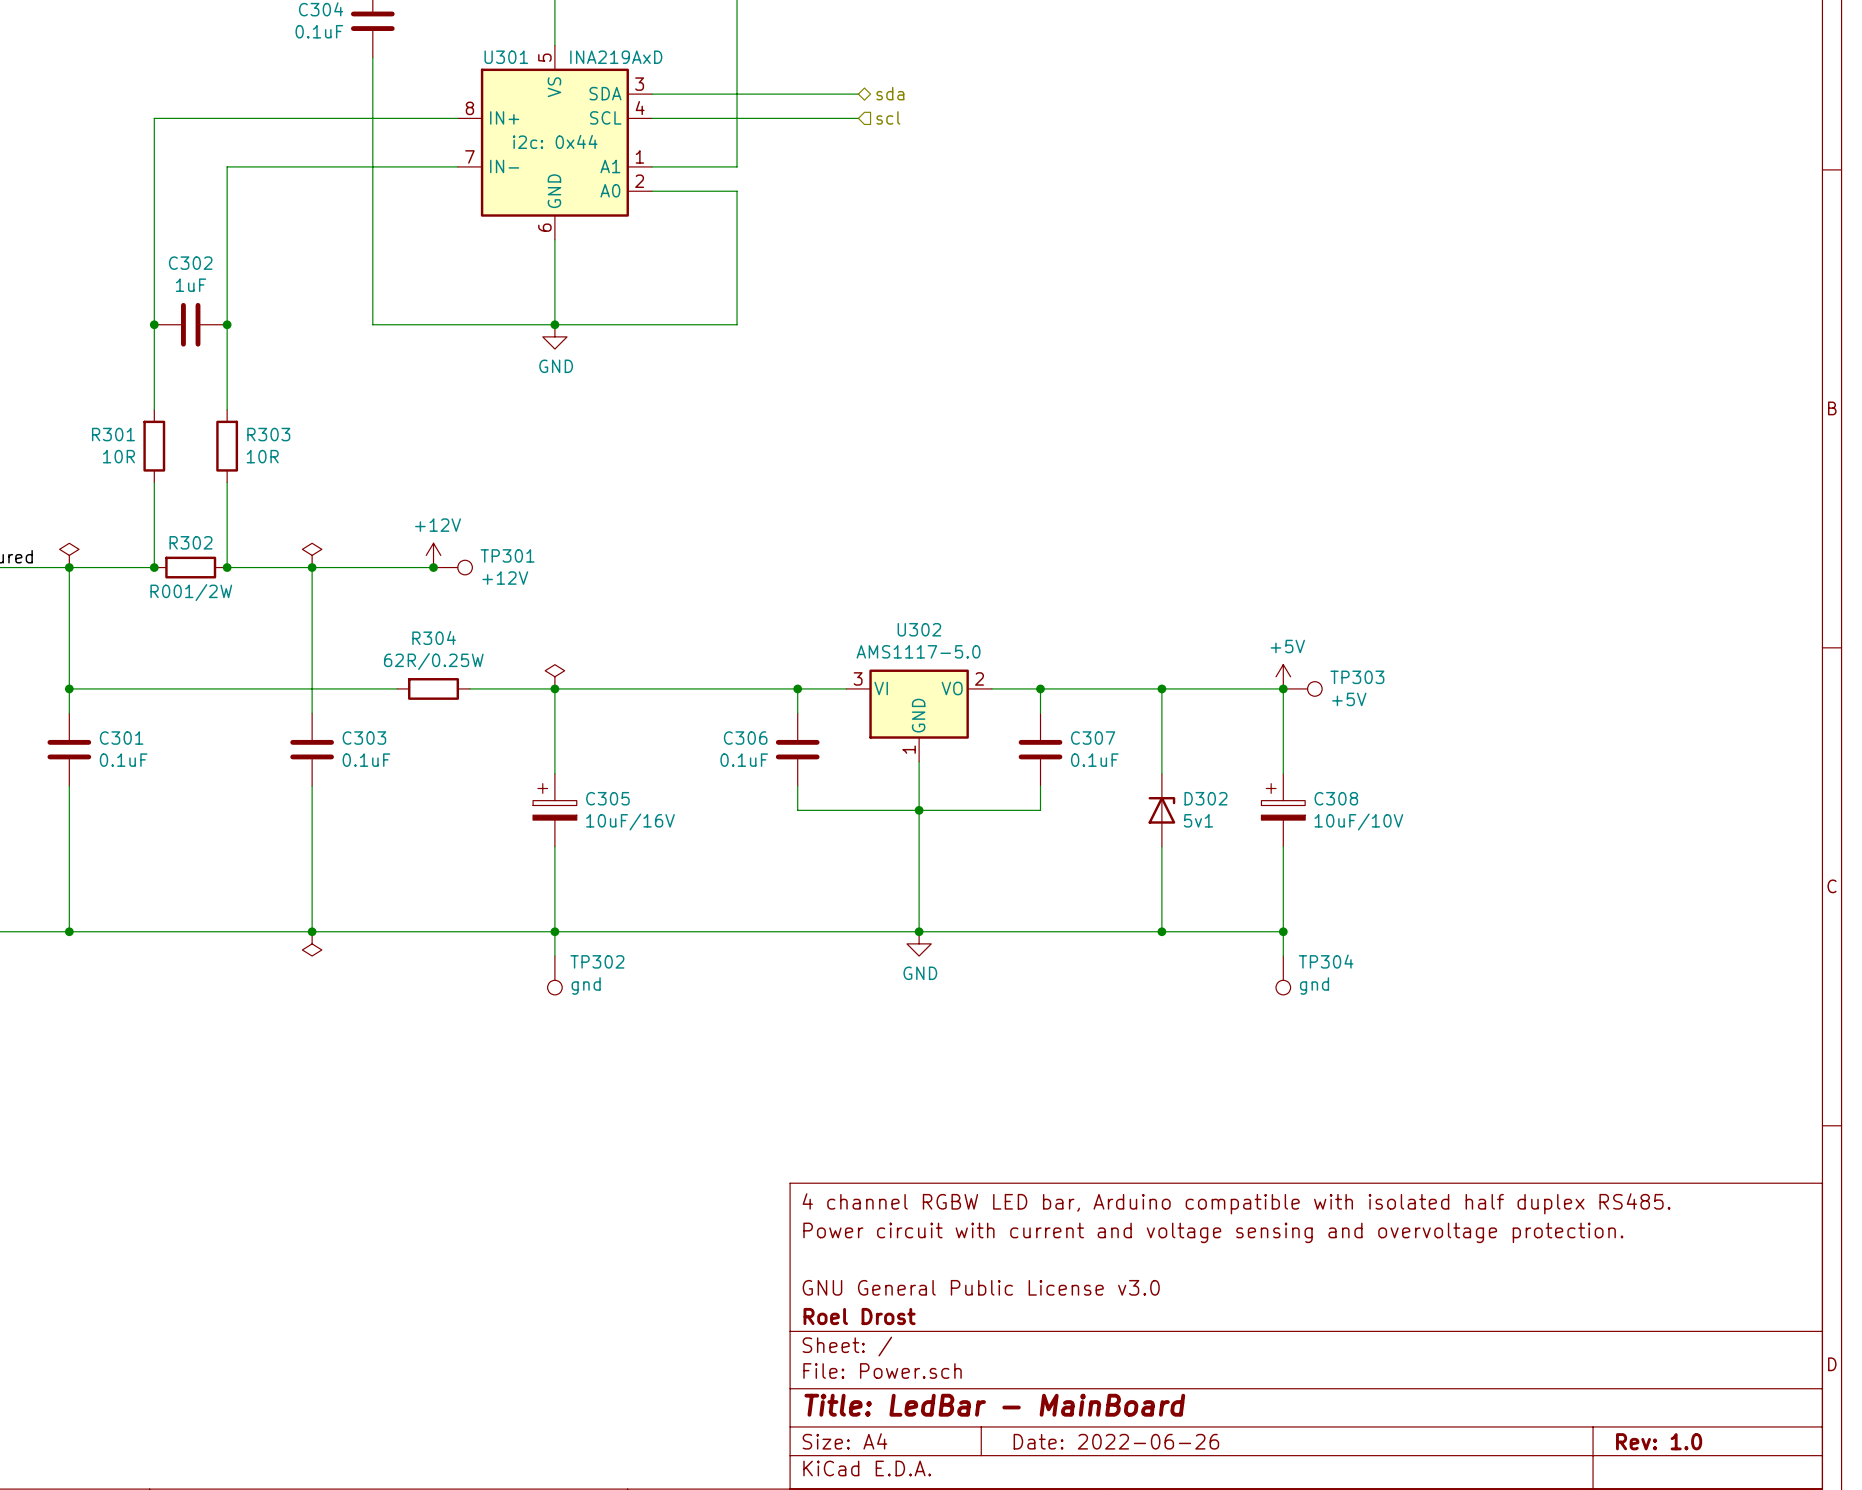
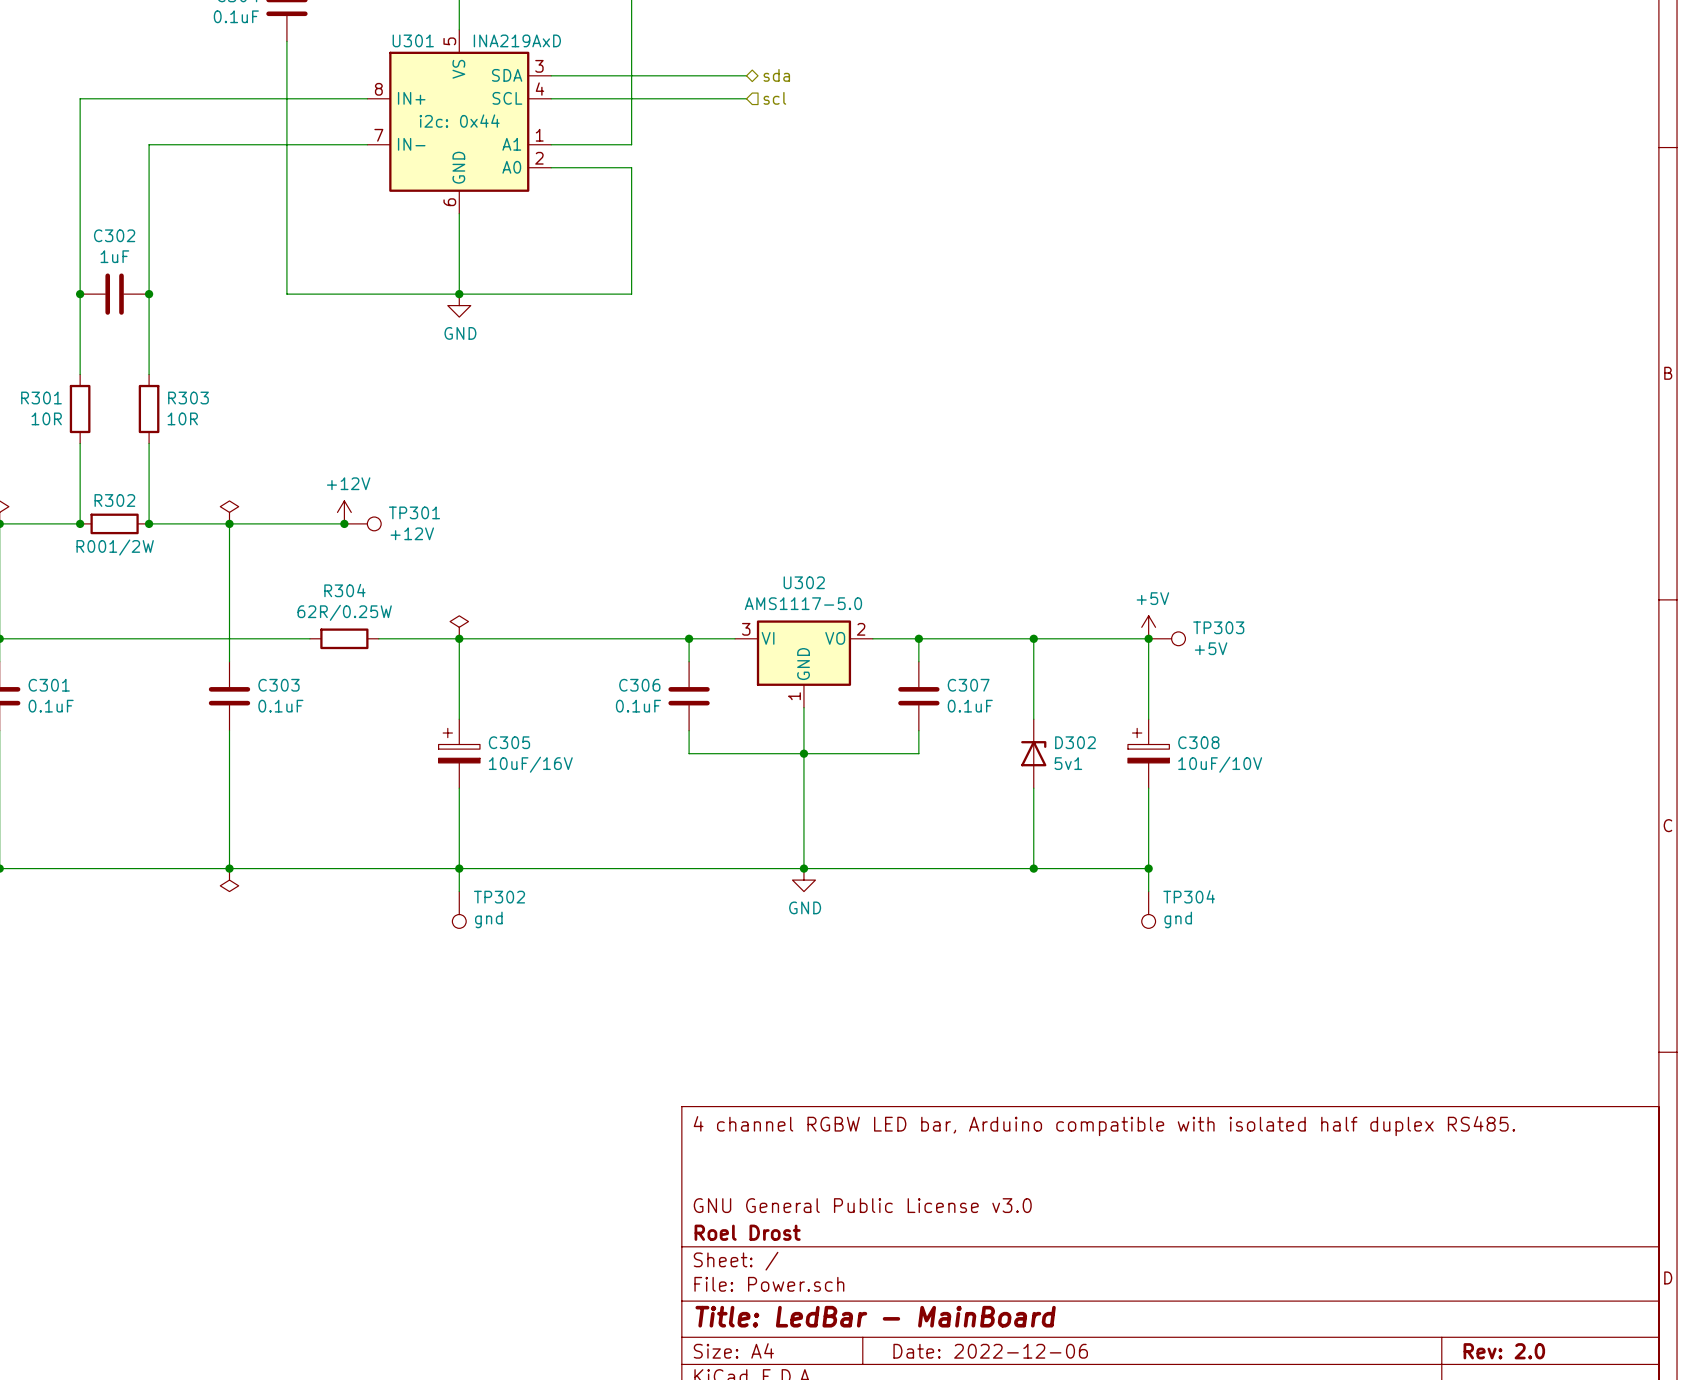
title block: Power circuit with current and voltage sensing and overvoltage protection. (1213, 1232) -> none
title block: Date: 2022-06-26 (1116, 1441) -> Date: 2022-12-06 (990, 1351)
title block: Rev: 1.0 (1659, 1441) -> Rev: 2.0 (1504, 1351)

